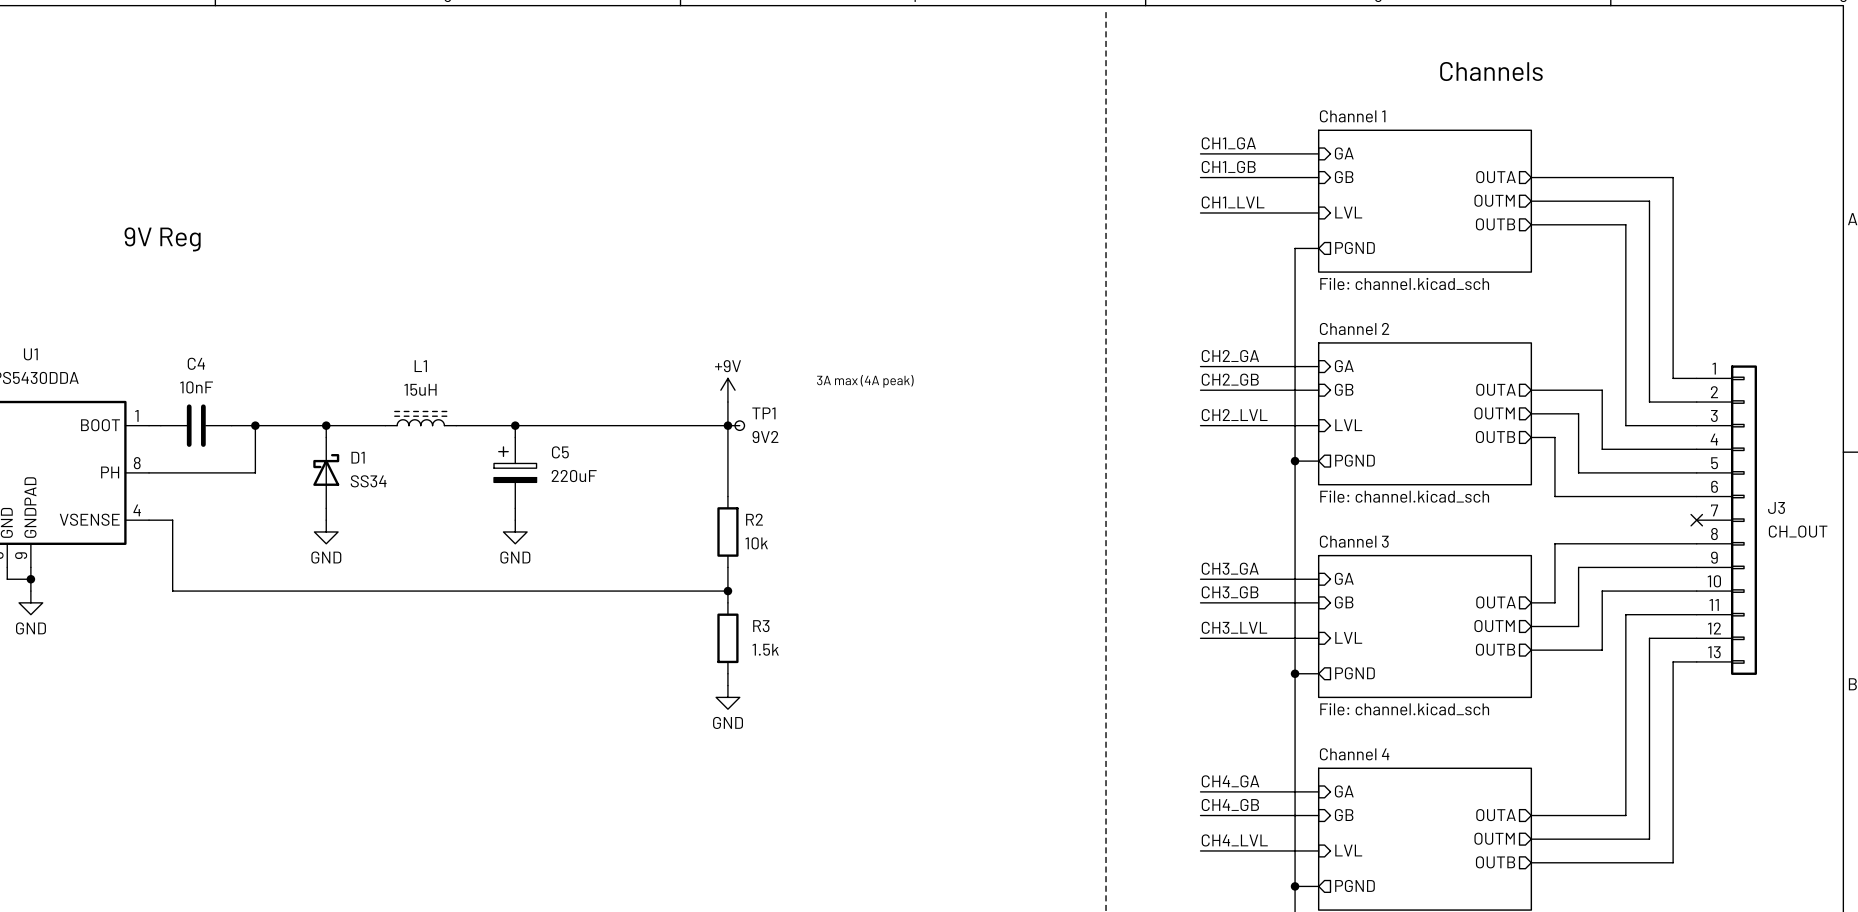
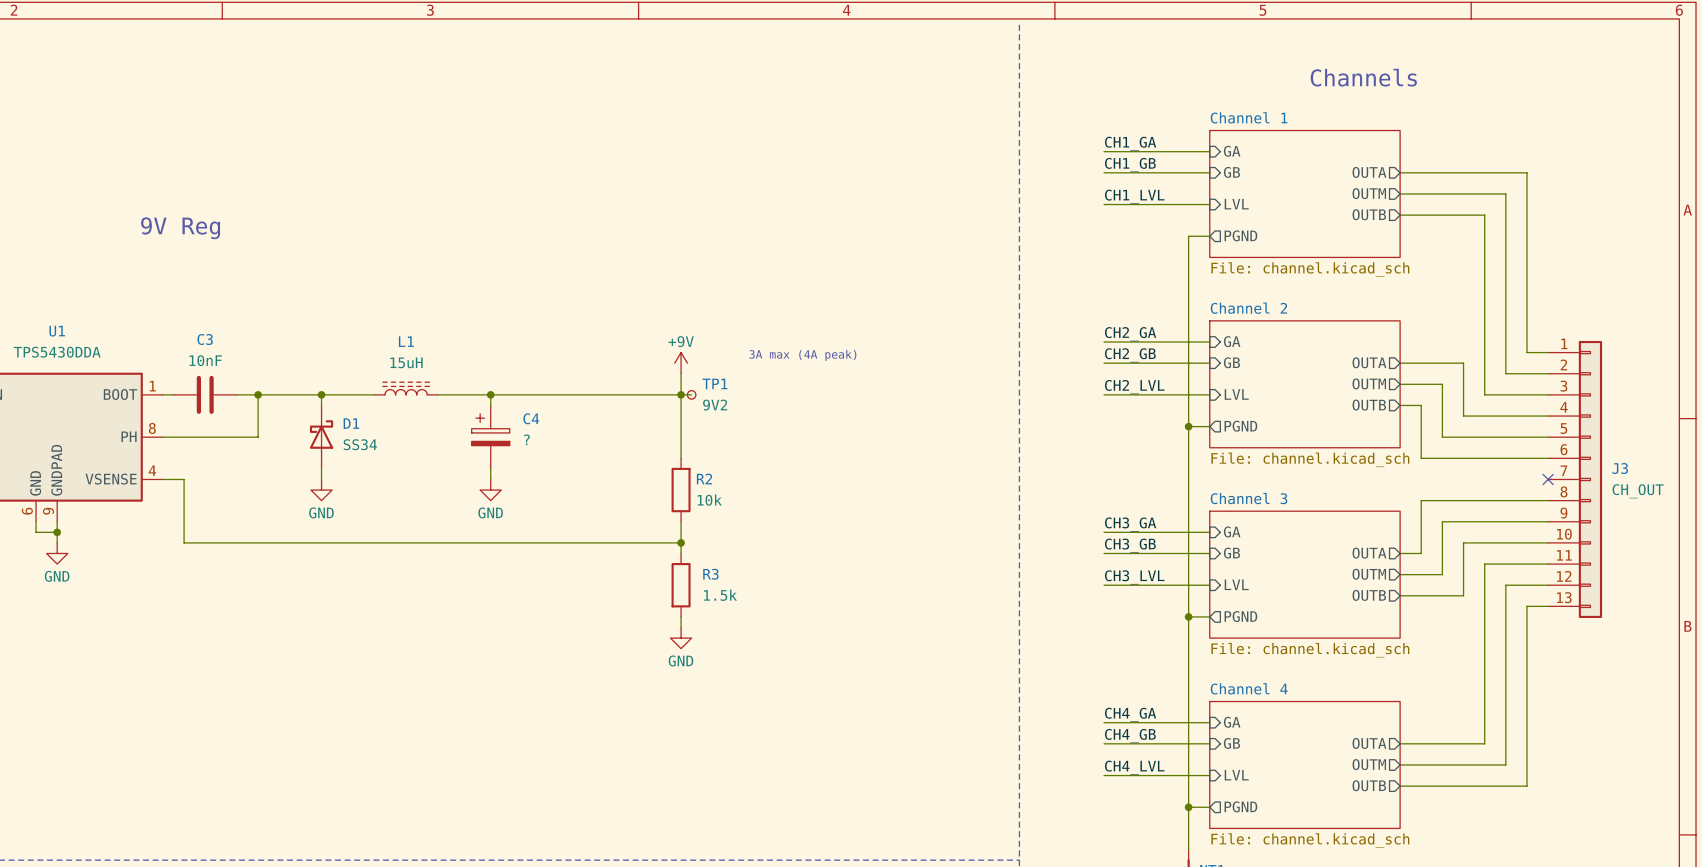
C4 name: C4 (196, 363) -> C3 (205, 339)
C5 name: C5 (560, 452) -> C4 (531, 418)
C5 value: 220uF (574, 476) -> ? (526, 439)

